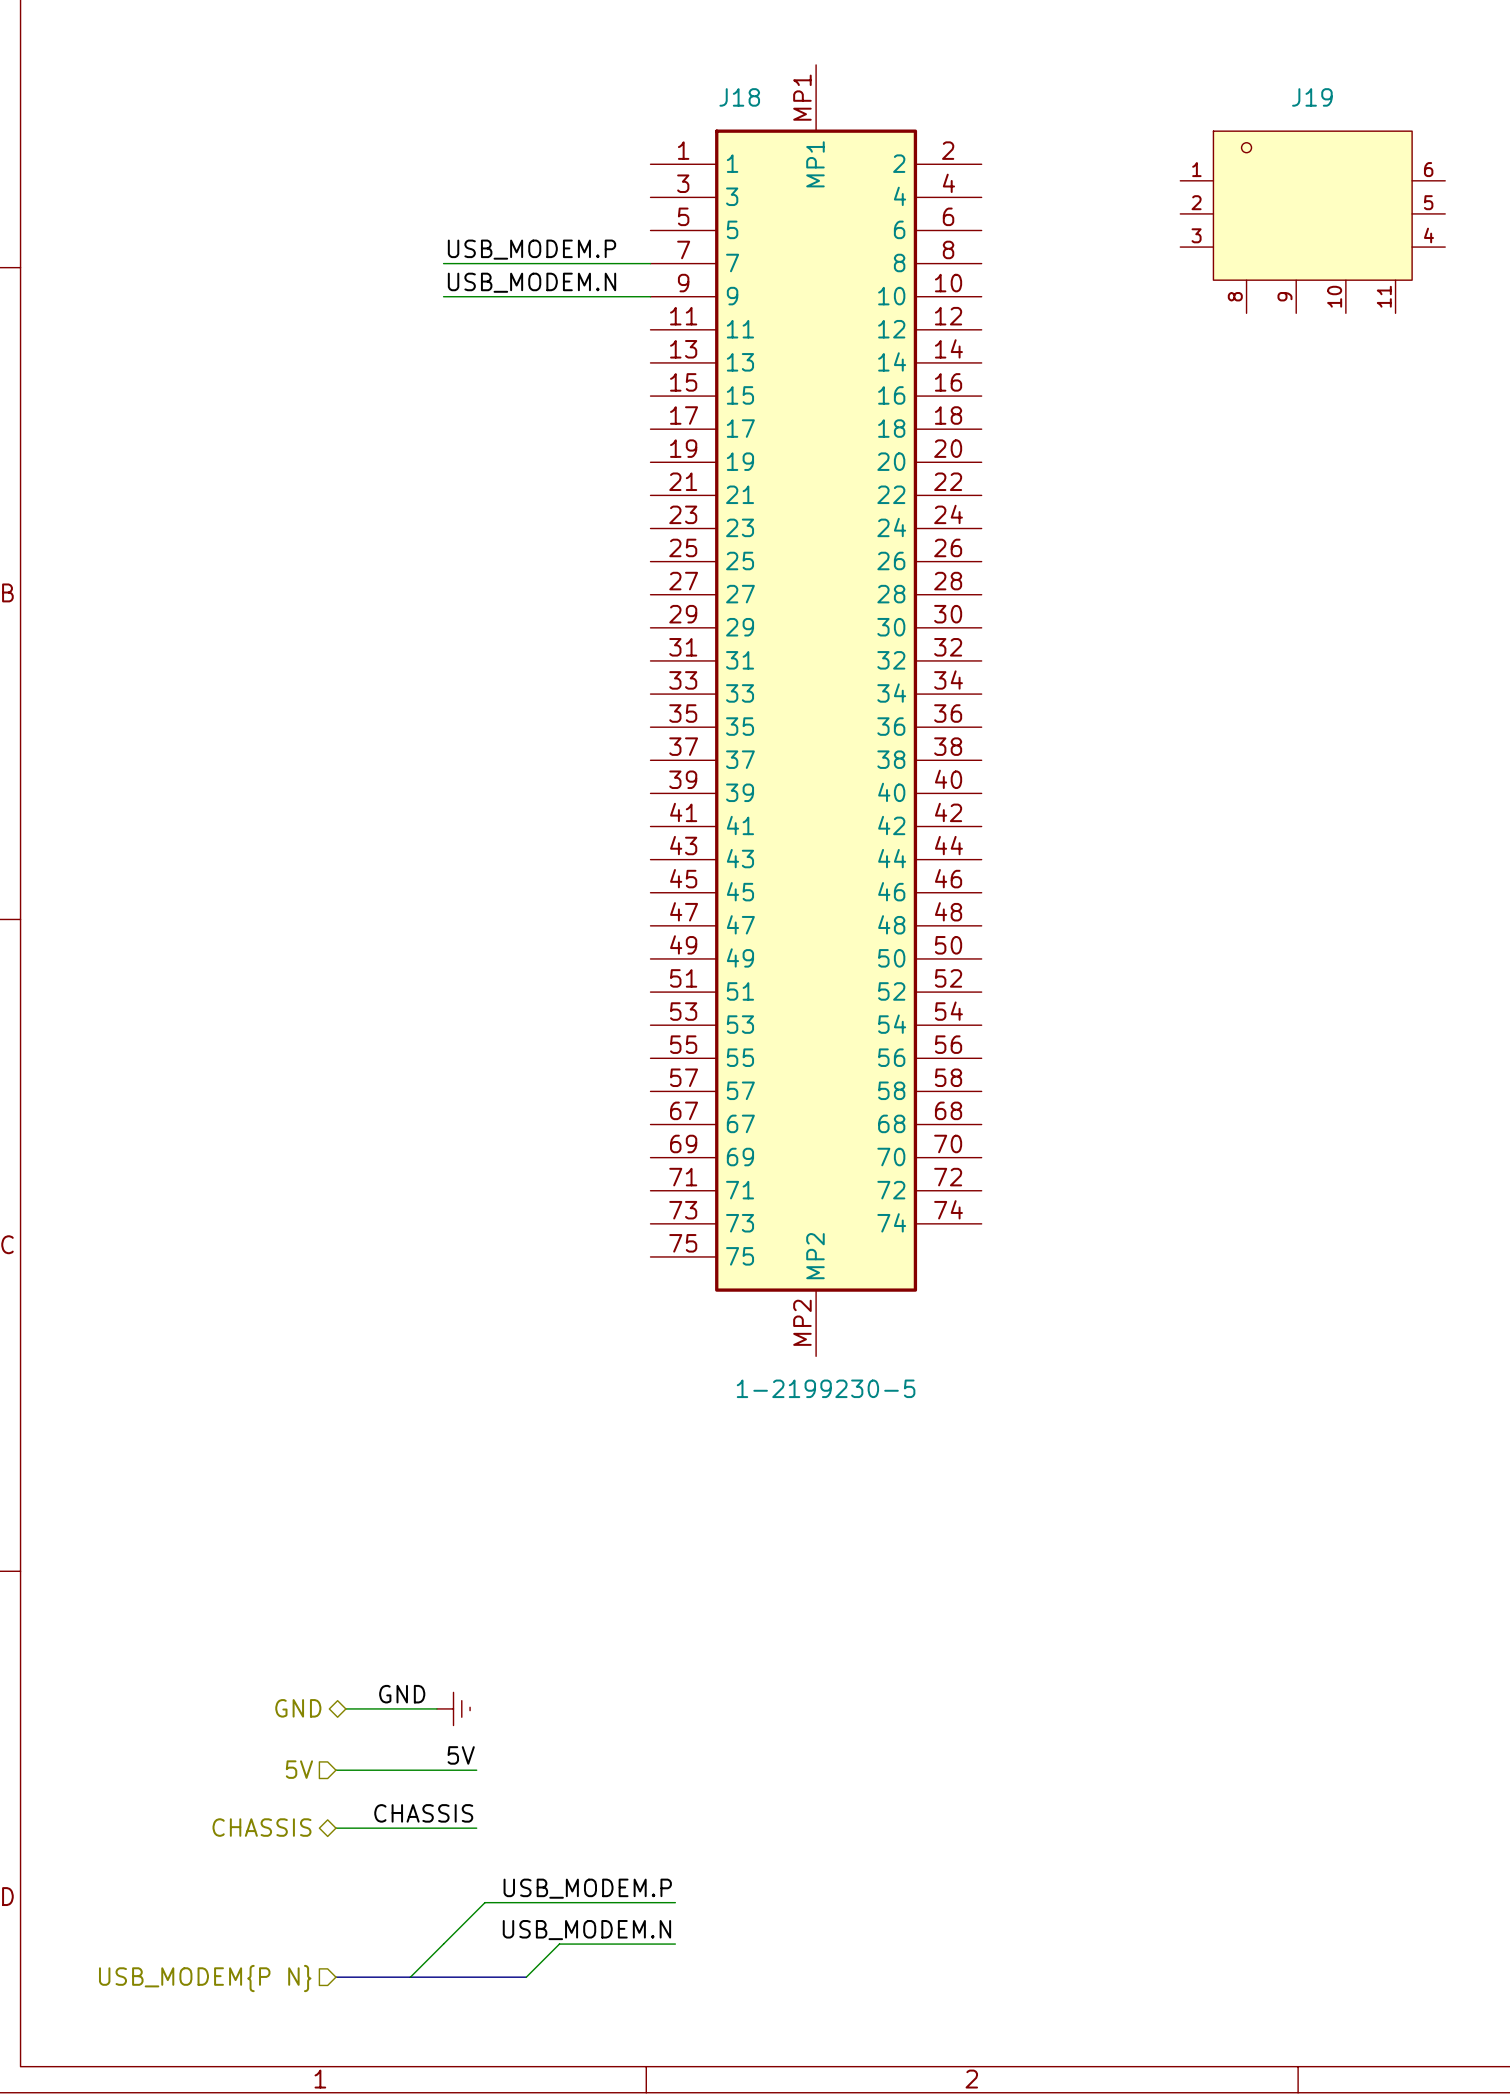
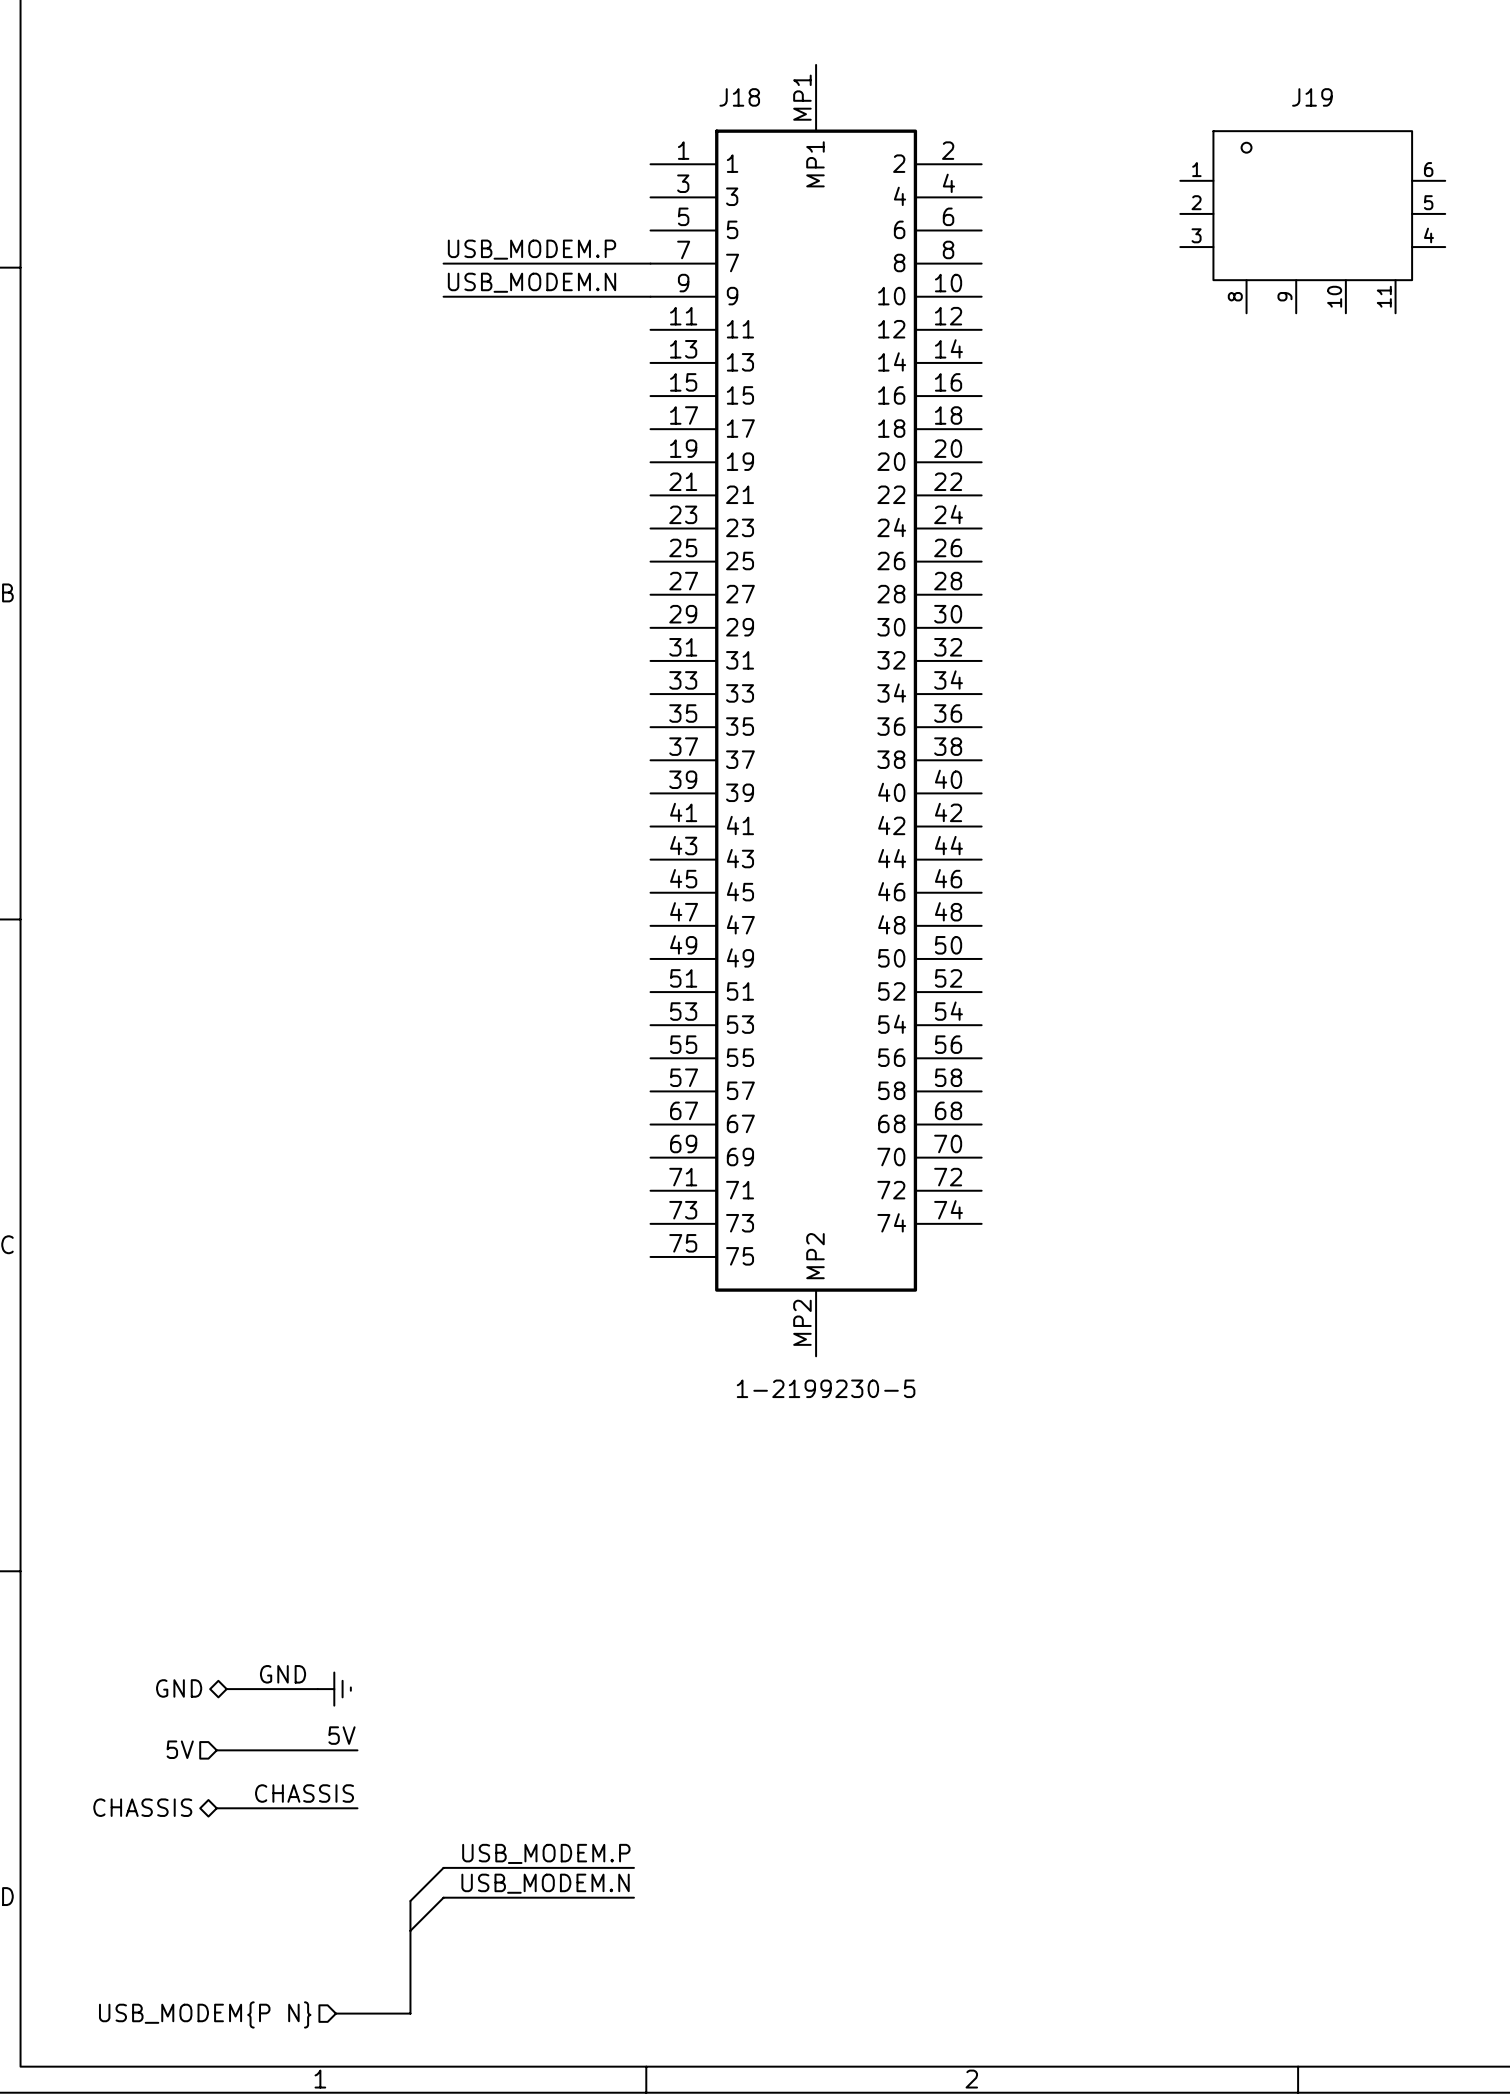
label position: GND (402, 1694) -> GND (283, 1674)
hierarchical label position: GND (298, 1708) -> GND (179, 1688)
wire: (345, 1708) (436, 1708) -> (226, 1689) (317, 1689)
power symbol position: (453, 1708) -> (334, 1689)
label position: 5V (461, 1755) -> 5V (341, 1735)
hierarchical label position: 5V (299, 1769) -> 5V (180, 1749)
wire: (335, 1770) (476, 1770) -> (216, 1750) (357, 1750)
label position: CHASSIS (423, 1813) -> CHASSIS (304, 1793)
hierarchical label position: CHASSIS (261, 1827) -> CHASSIS (142, 1807)
wire: (335, 1828) (476, 1828) -> (216, 1808) (357, 1808)
wire: none -> (633, 1867) (443, 1867) (410, 1901)
label position: USB_MODEM.P (587, 1888) -> USB_MODEM.P (546, 1853)
wire: none -> (633, 1897) (443, 1897) (410, 1930)
bus: none -> (410, 1901) (410, 2013) (335, 2013)
wire: (675, 1902) (484, 1902) (410, 1977) -> none
label position: USB_MODEM.N (586, 1930) -> USB_MODEM.N (545, 1883)
wire: (675, 1944) (559, 1944) (526, 1977) -> none
bus: (335, 1977) (526, 1977) -> none
hierarchical label position: USB_MODEM{P N} (205, 1978) -> USB_MODEM{P N} (205, 2014)

